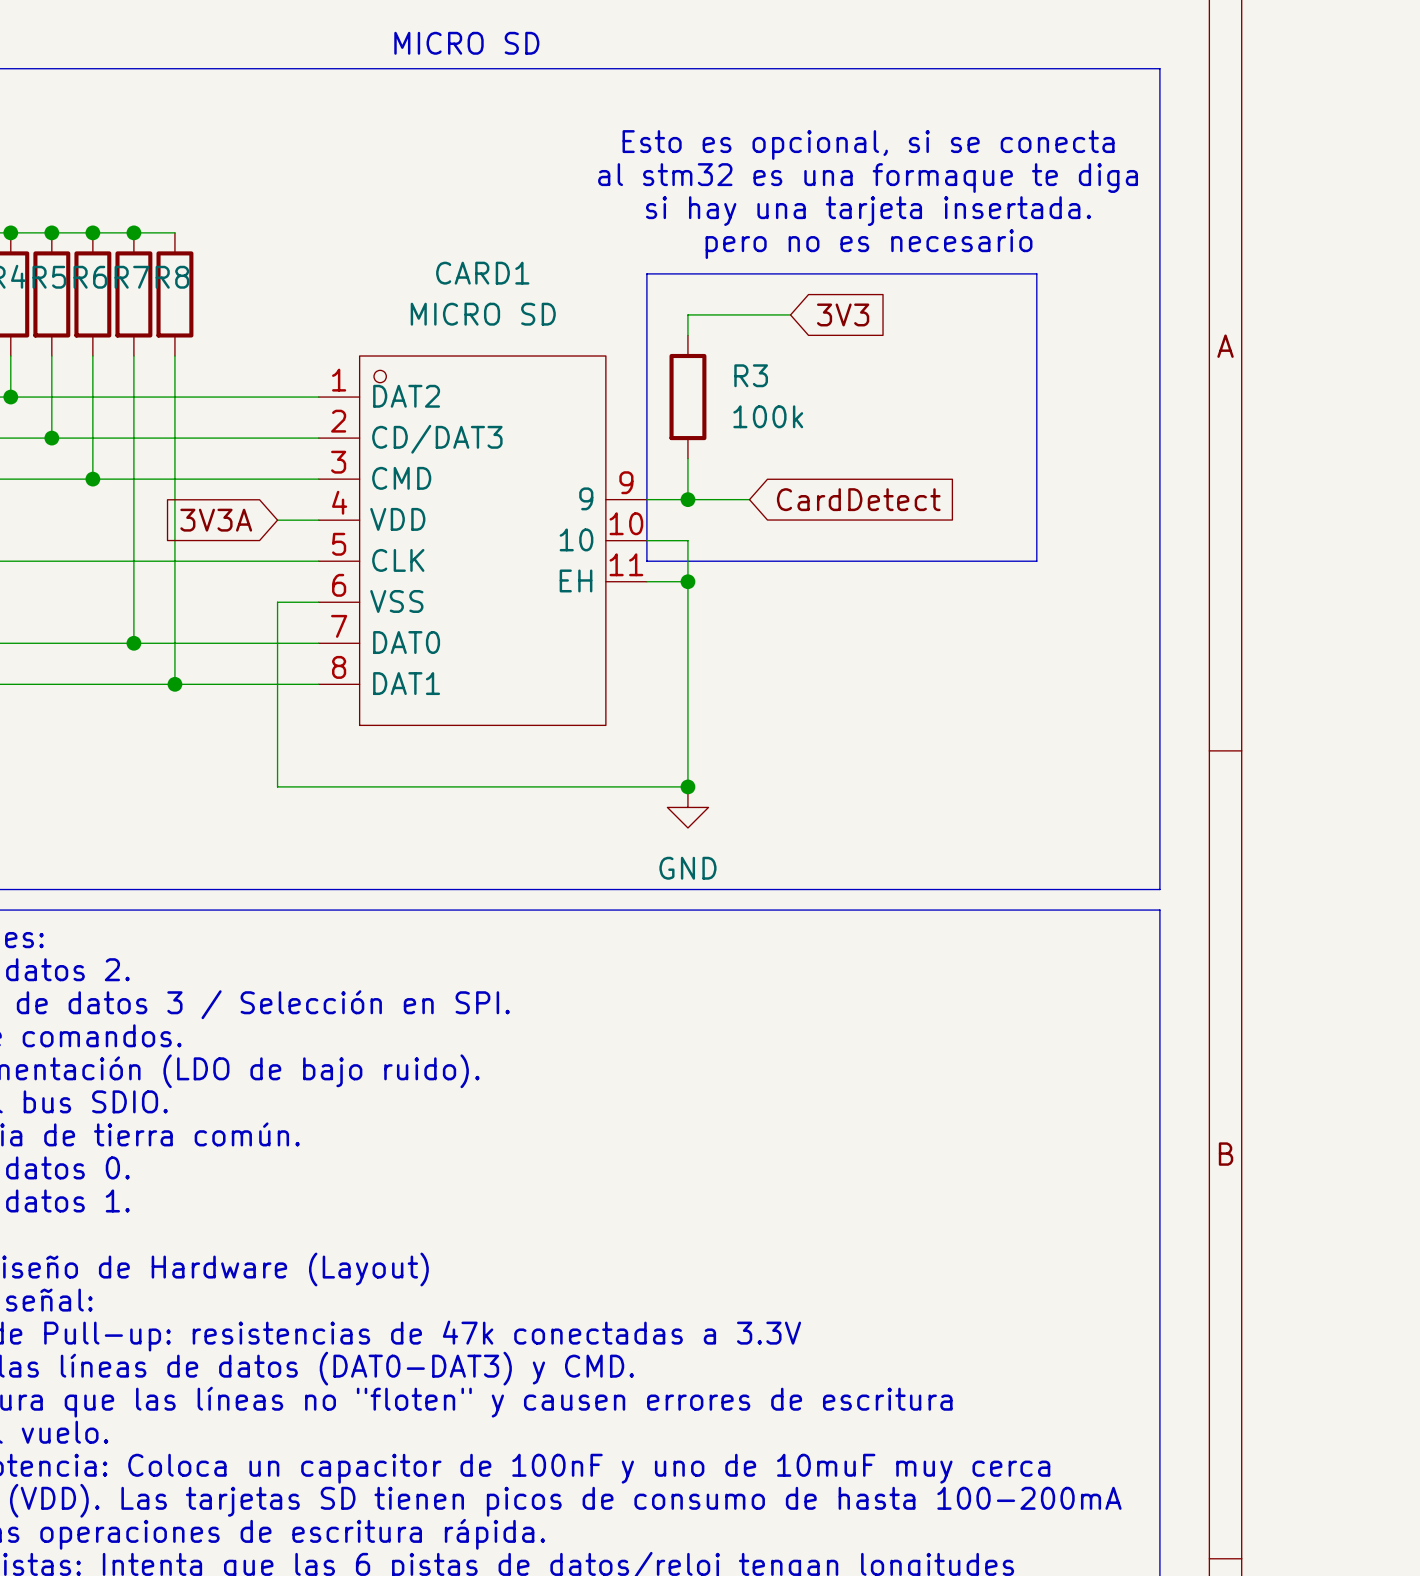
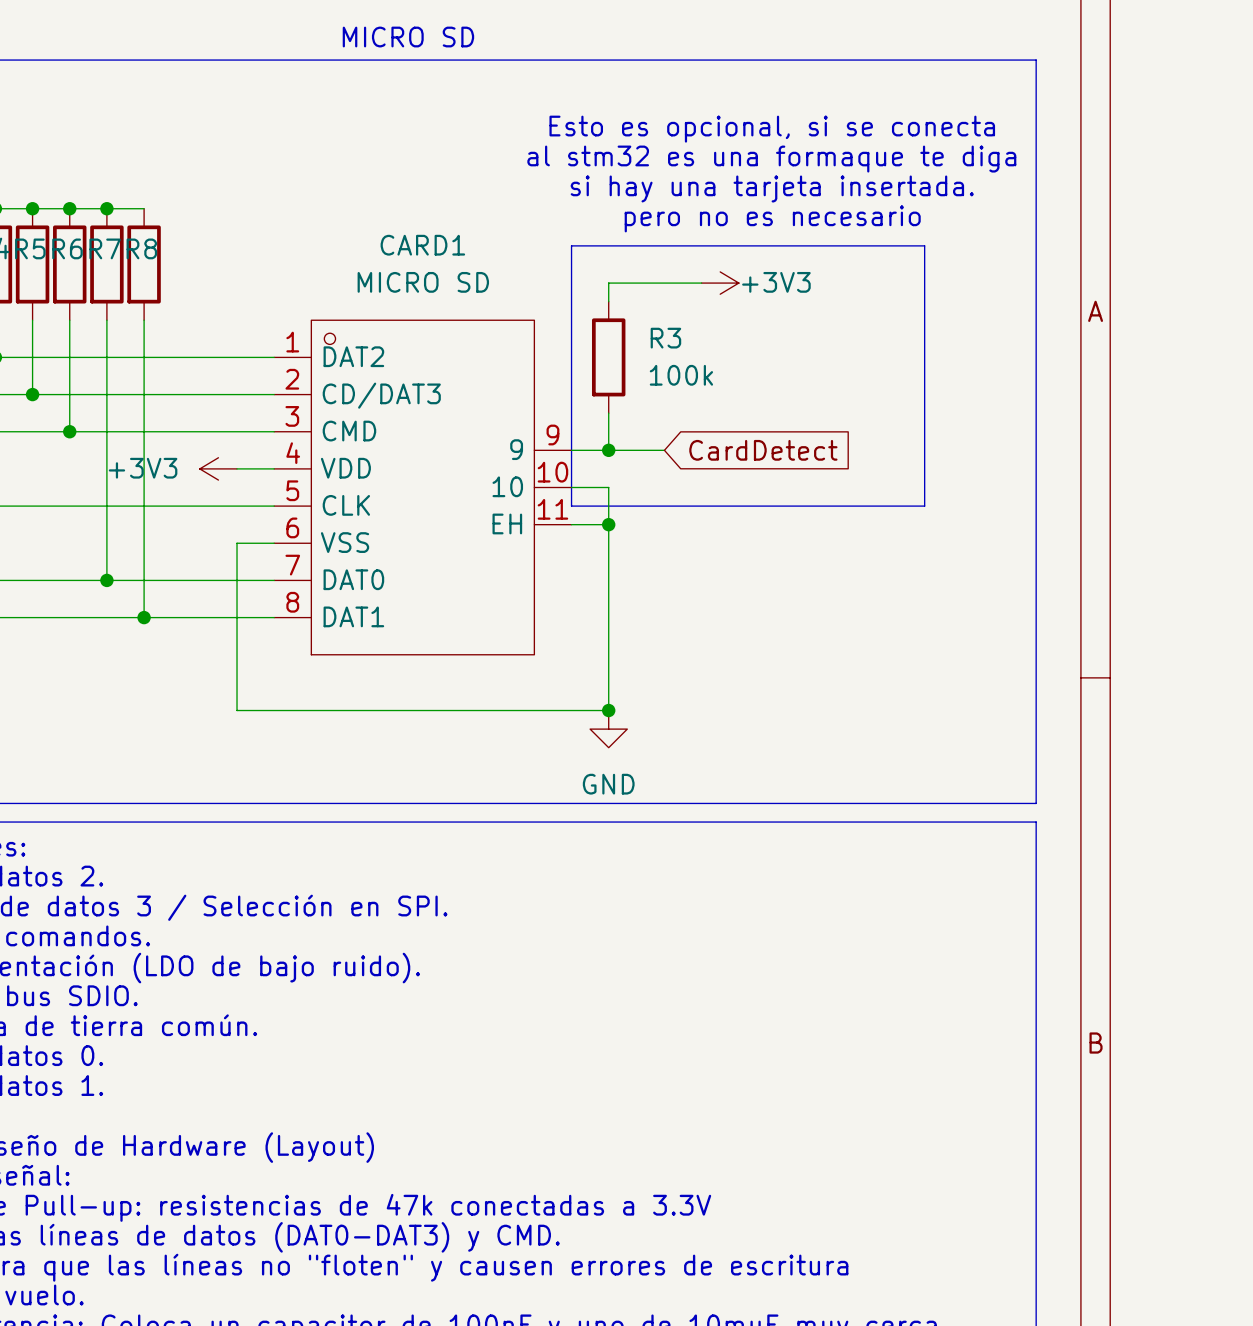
power symbol: none -> +3V3 (720, 283)
global label: 3V3 (843, 314) -> none
global label: 3V3A (216, 520) -> none
power symbol: none -> +3V3 (218, 468)

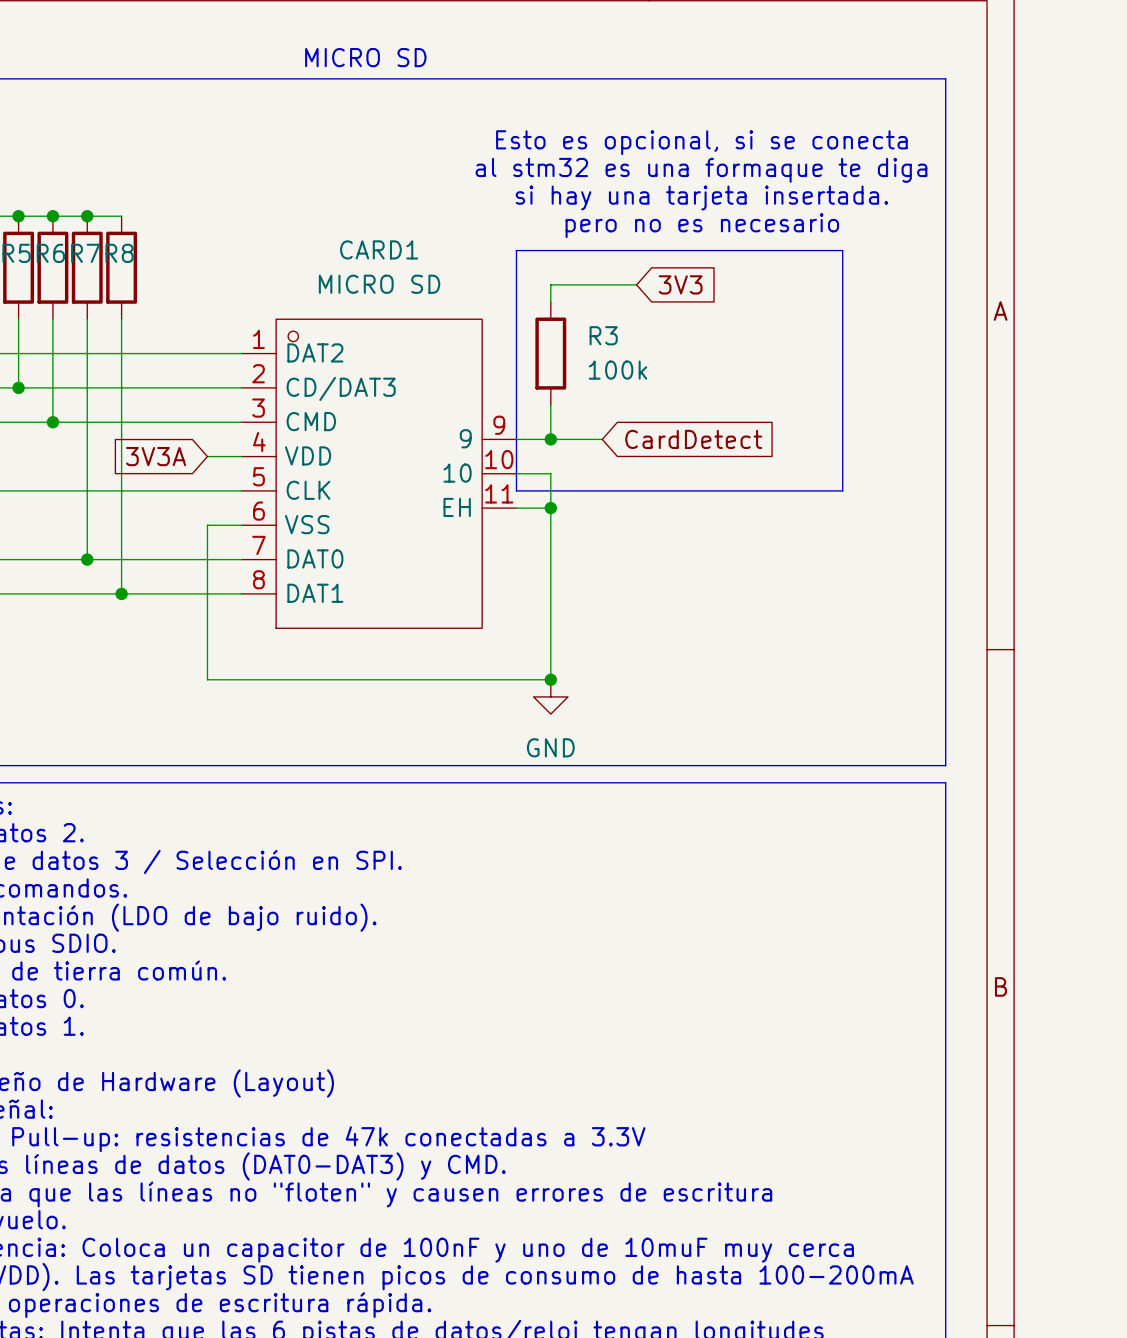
power symbol: +3V3 (720, 283) -> none
global label: none -> 3V3 (680, 284)
global label: none -> 3V3A (156, 456)
power symbol: +3V3 (218, 468) -> none

